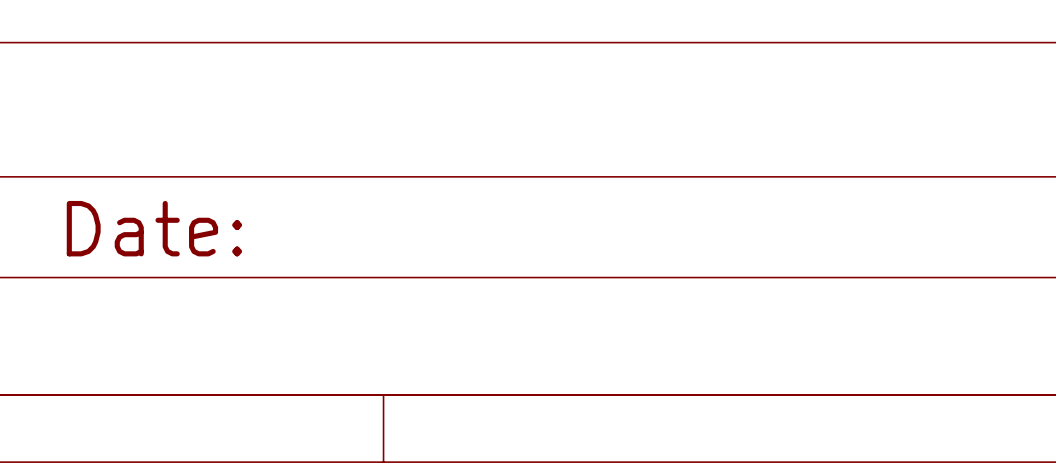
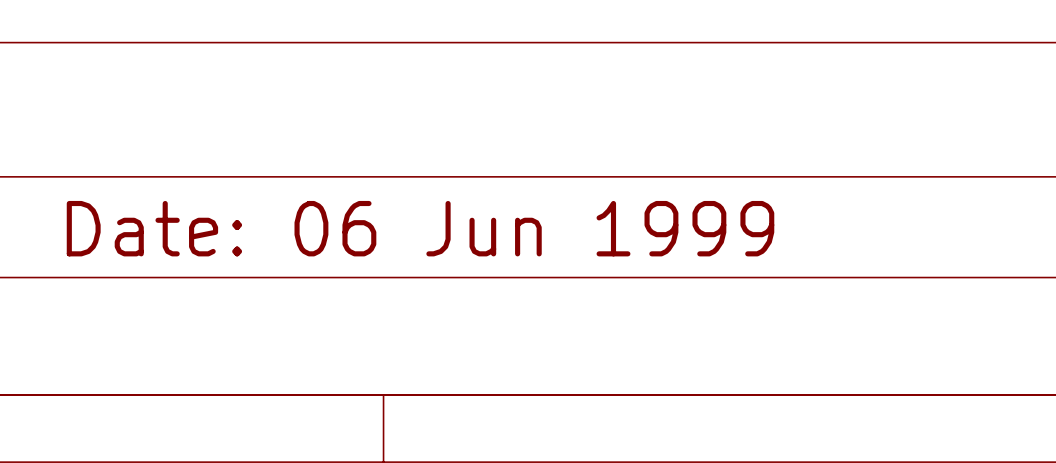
title block: Date: (154, 228) -> Date: 06 Jun 1999 (420, 228)

